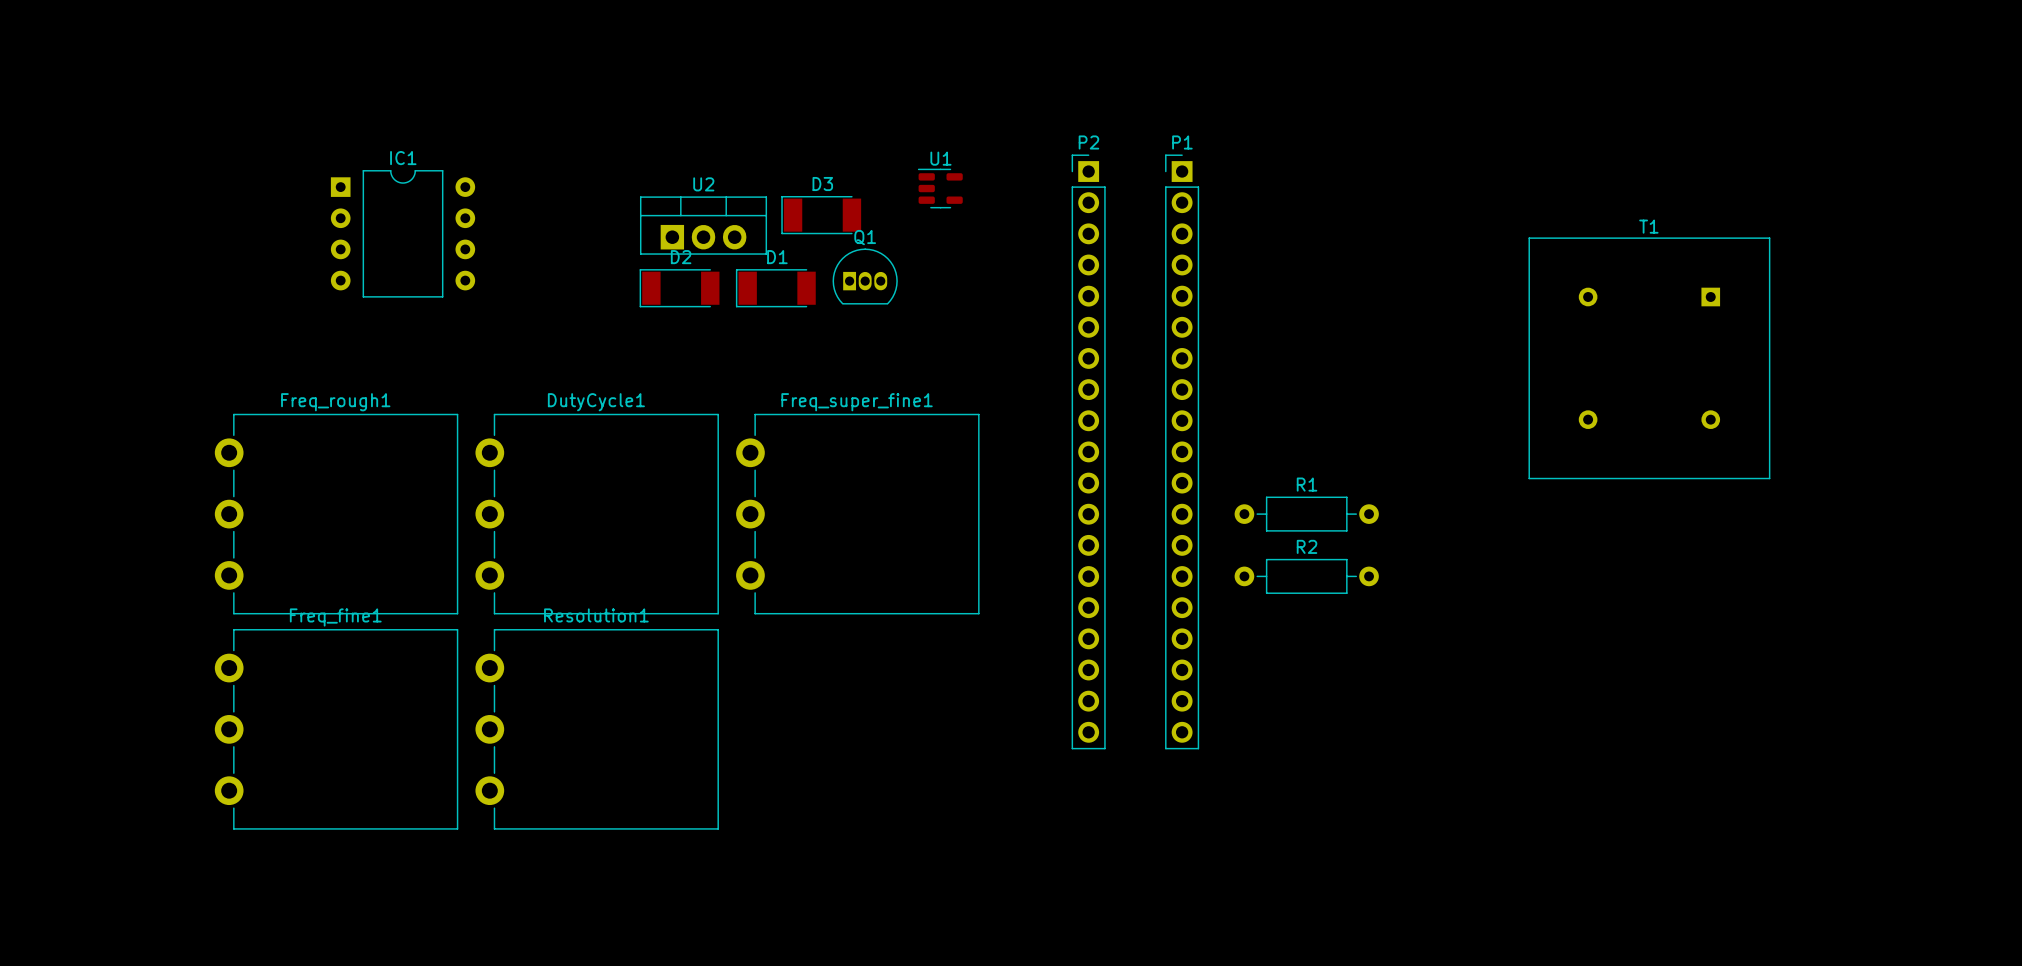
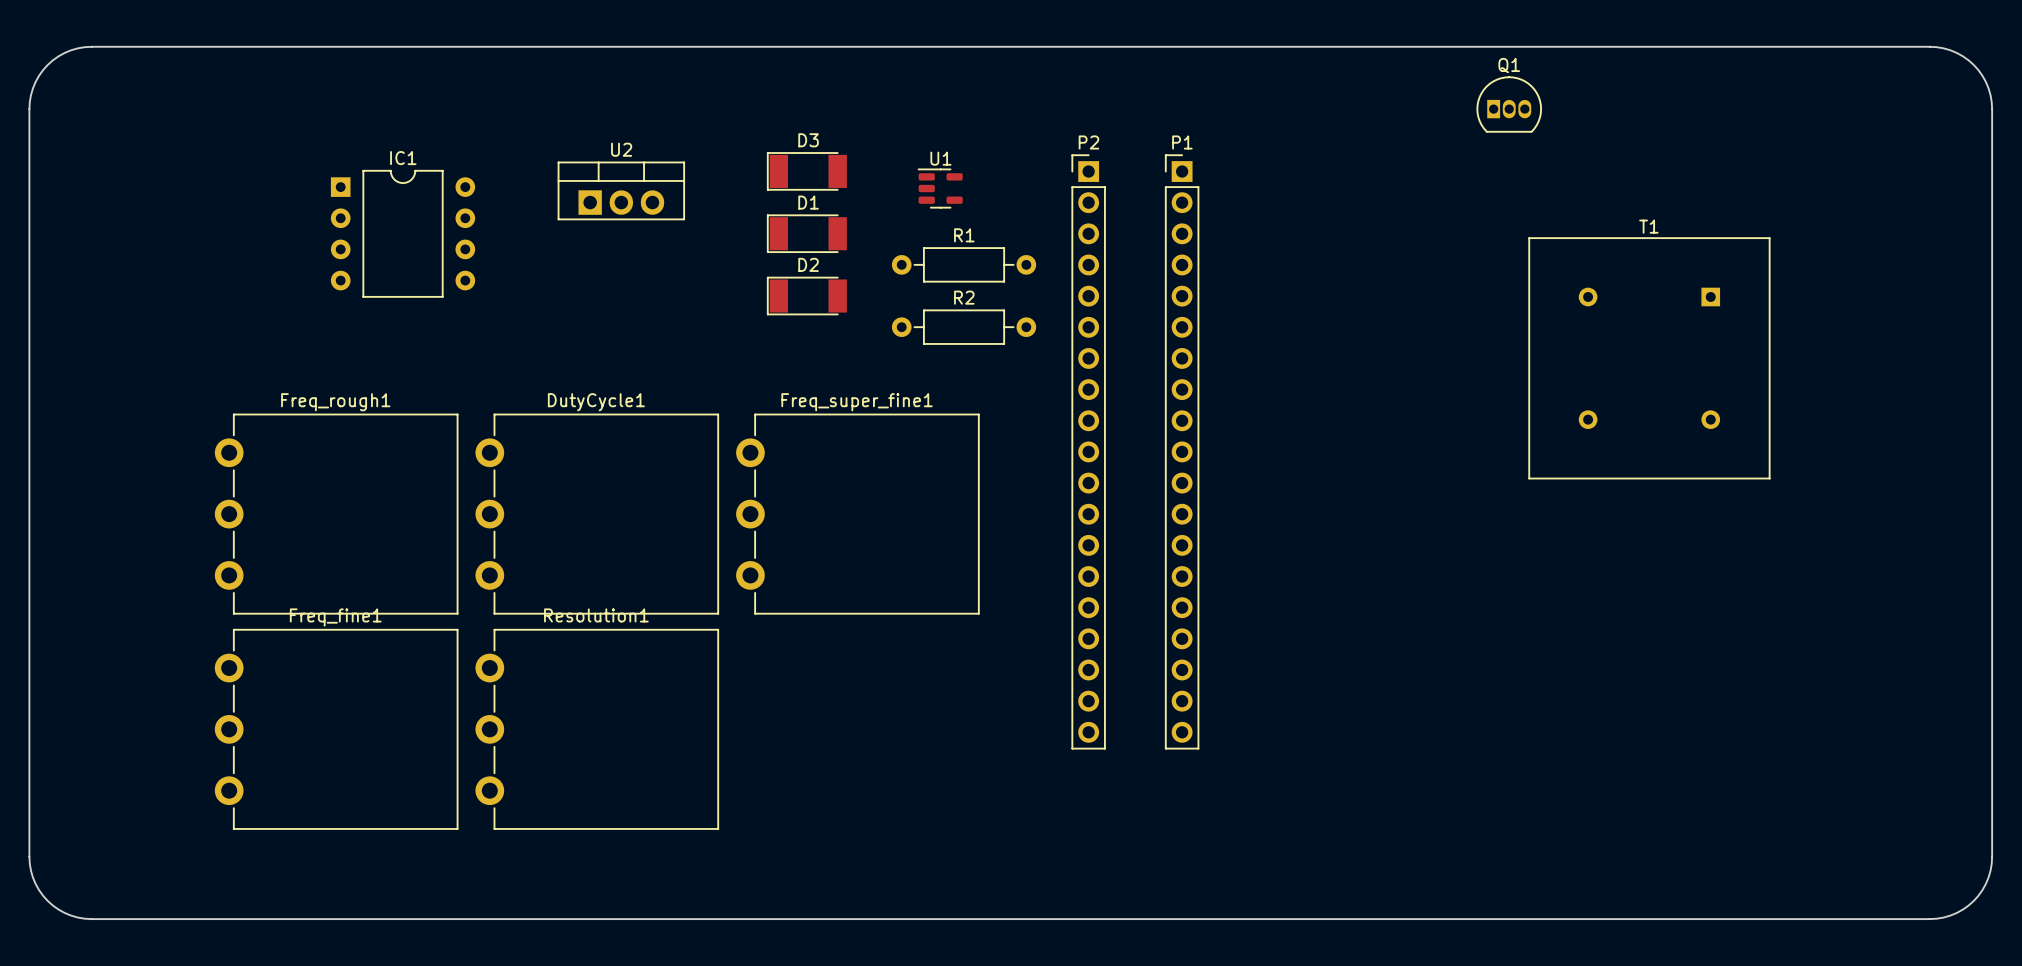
board edge: none -> (91, 46) (1929, 46) (1943, 48) (1956, 52) (1973, 65) (1982, 75) (1990, 95) (1992, 109) (1992, 856) (1990, 870) (1985, 883) (1973, 900) (1962, 909) (1950, 915) (1929, 919) (91, 919) (77, 917) (64, 912) (52, 905) (38, 889) (32, 877) (29, 856) (29, 109) (30, 95) (35, 82) (47, 65) (58, 56) (71, 50) (91, 46)
D3 position: (821, 215) -> (806, 171)
U2 position: (703, 225) -> (621, 190)
Q1 position: (865, 276) -> (1509, 104)
D2 position: (679, 288) -> (806, 296)
D1 position: (775, 288) -> (806, 233)
R1 position: (1306, 514) -> (964, 264)
R2 position: (1306, 576) -> (964, 327)

